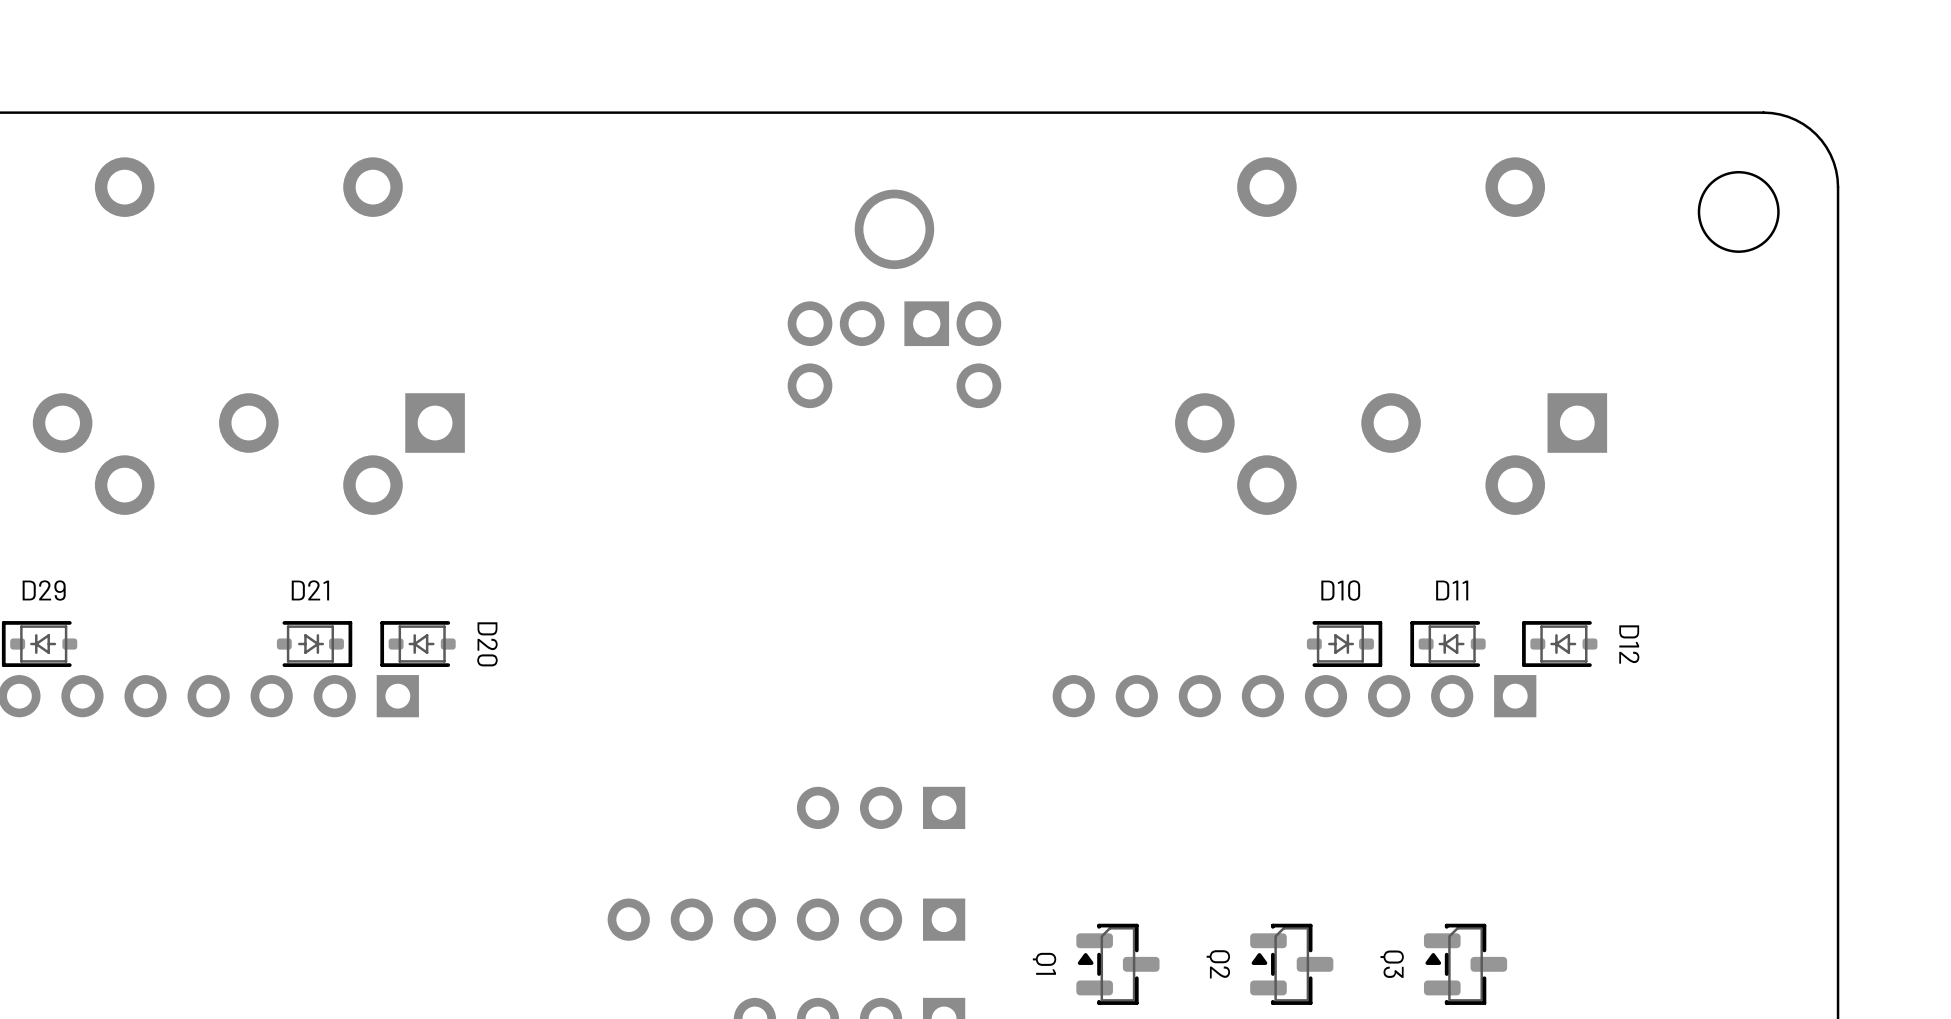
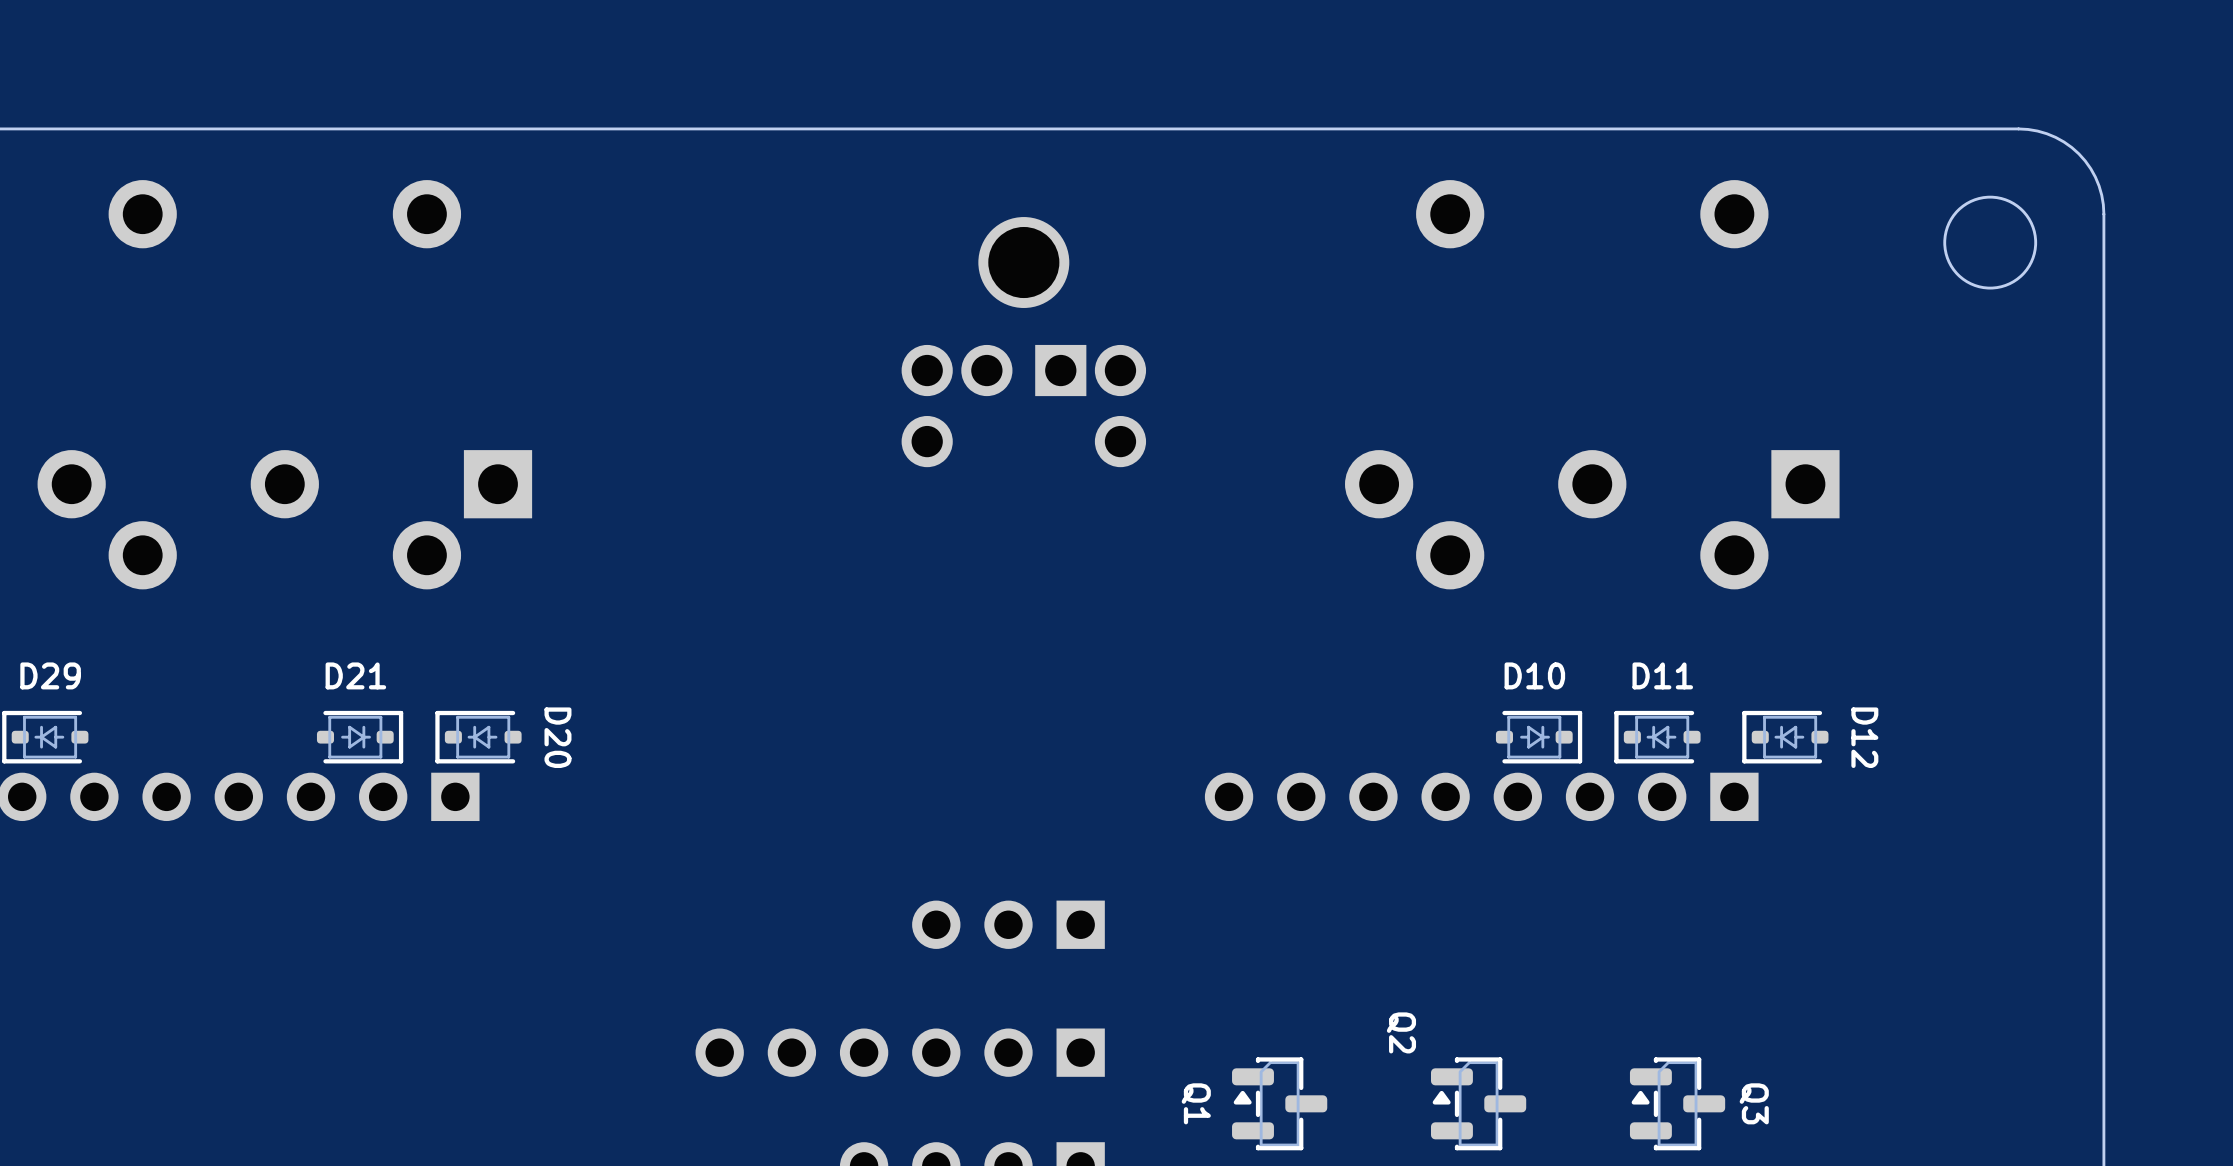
Q2 name position: Q2 (1218, 964) -> Q2 (1401, 1032)
Q3 name position: Q3 (1392, 964) -> Q3 (1754, 1103)

